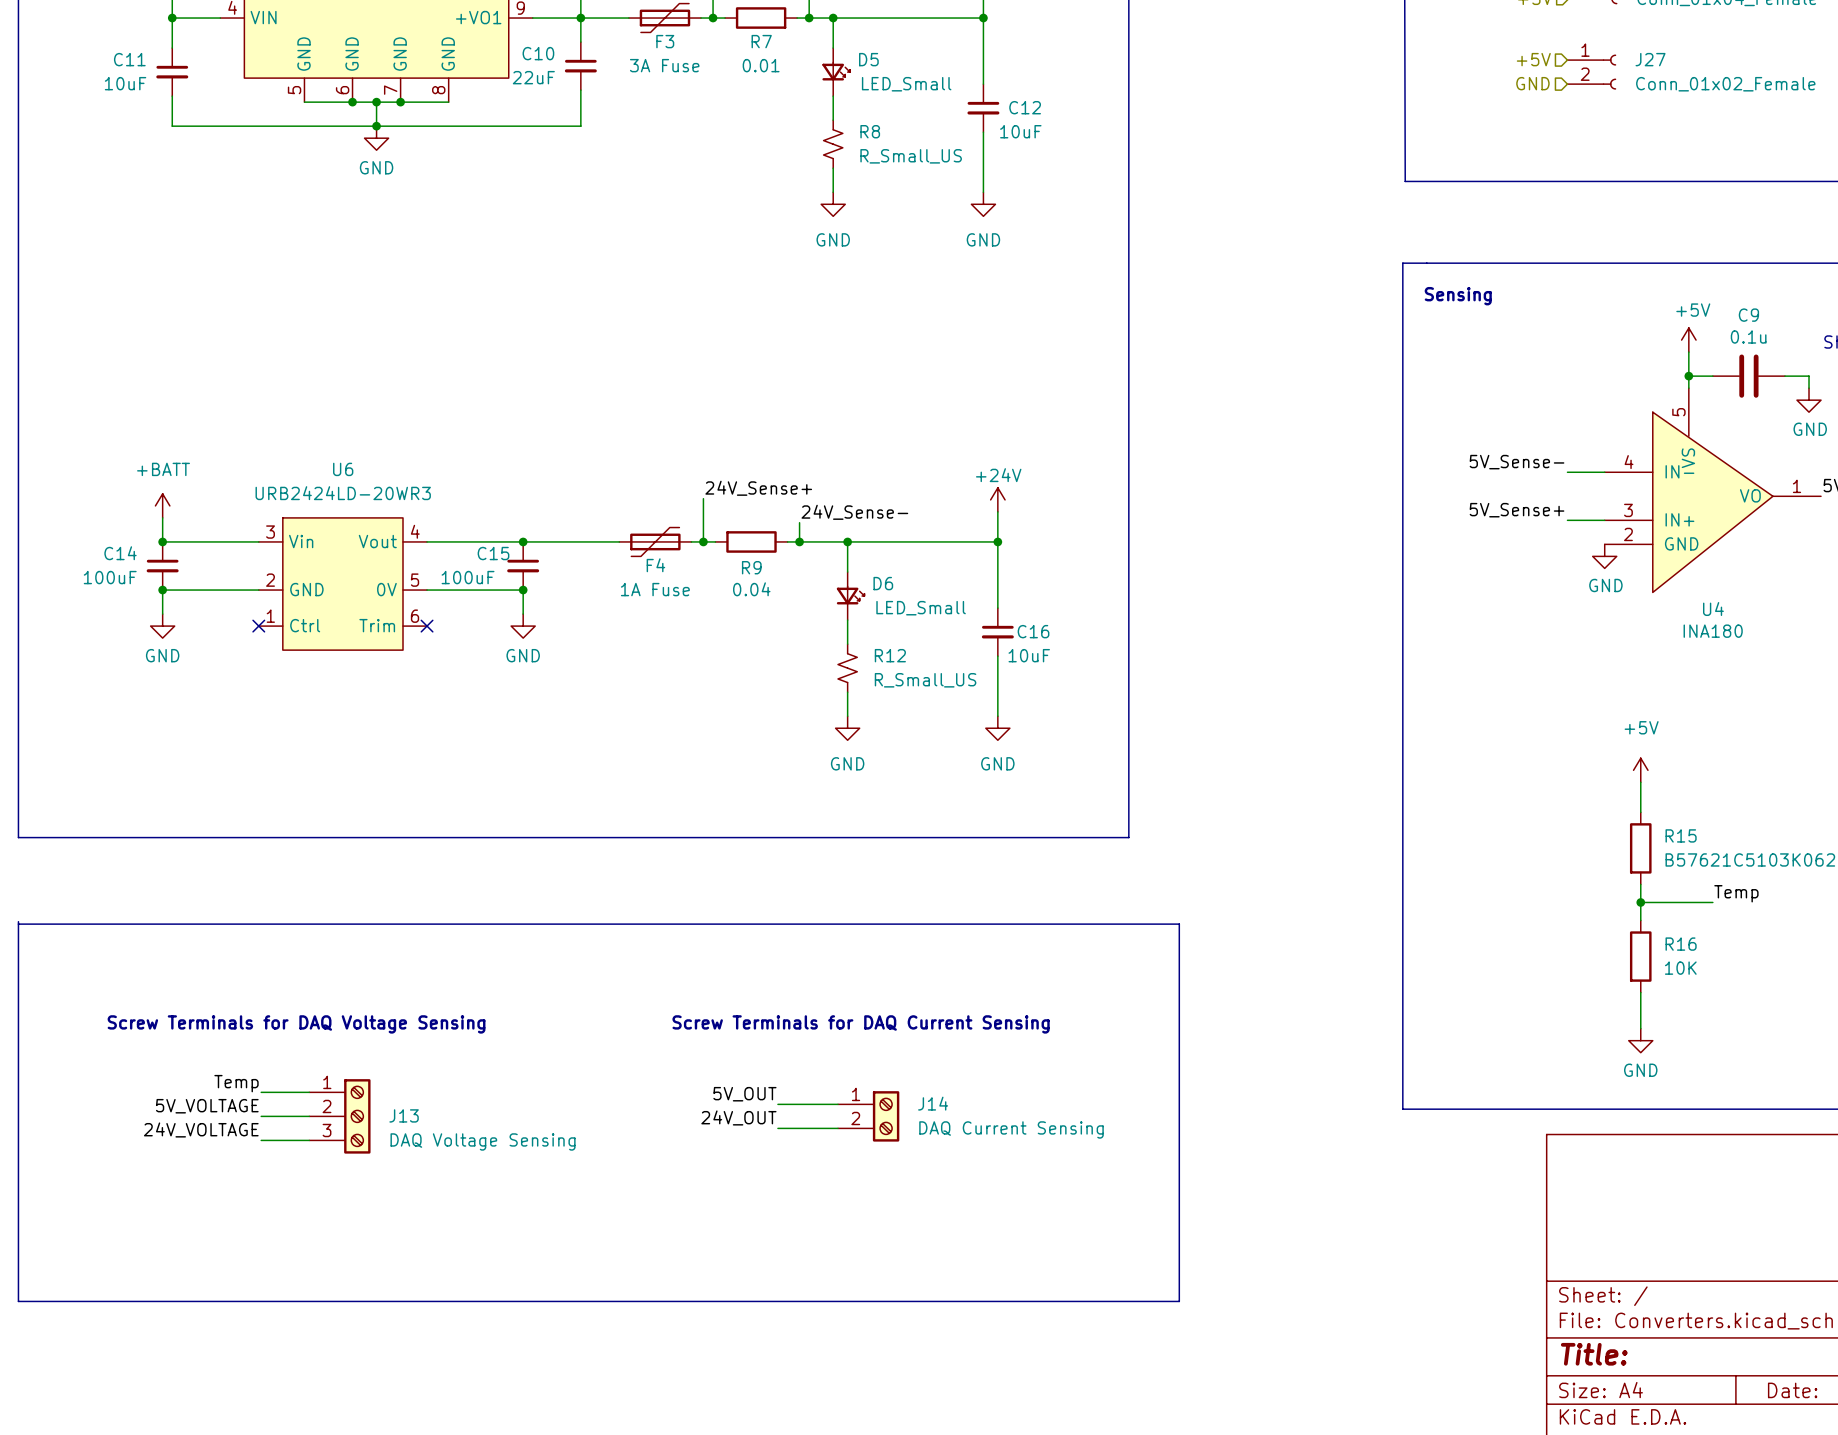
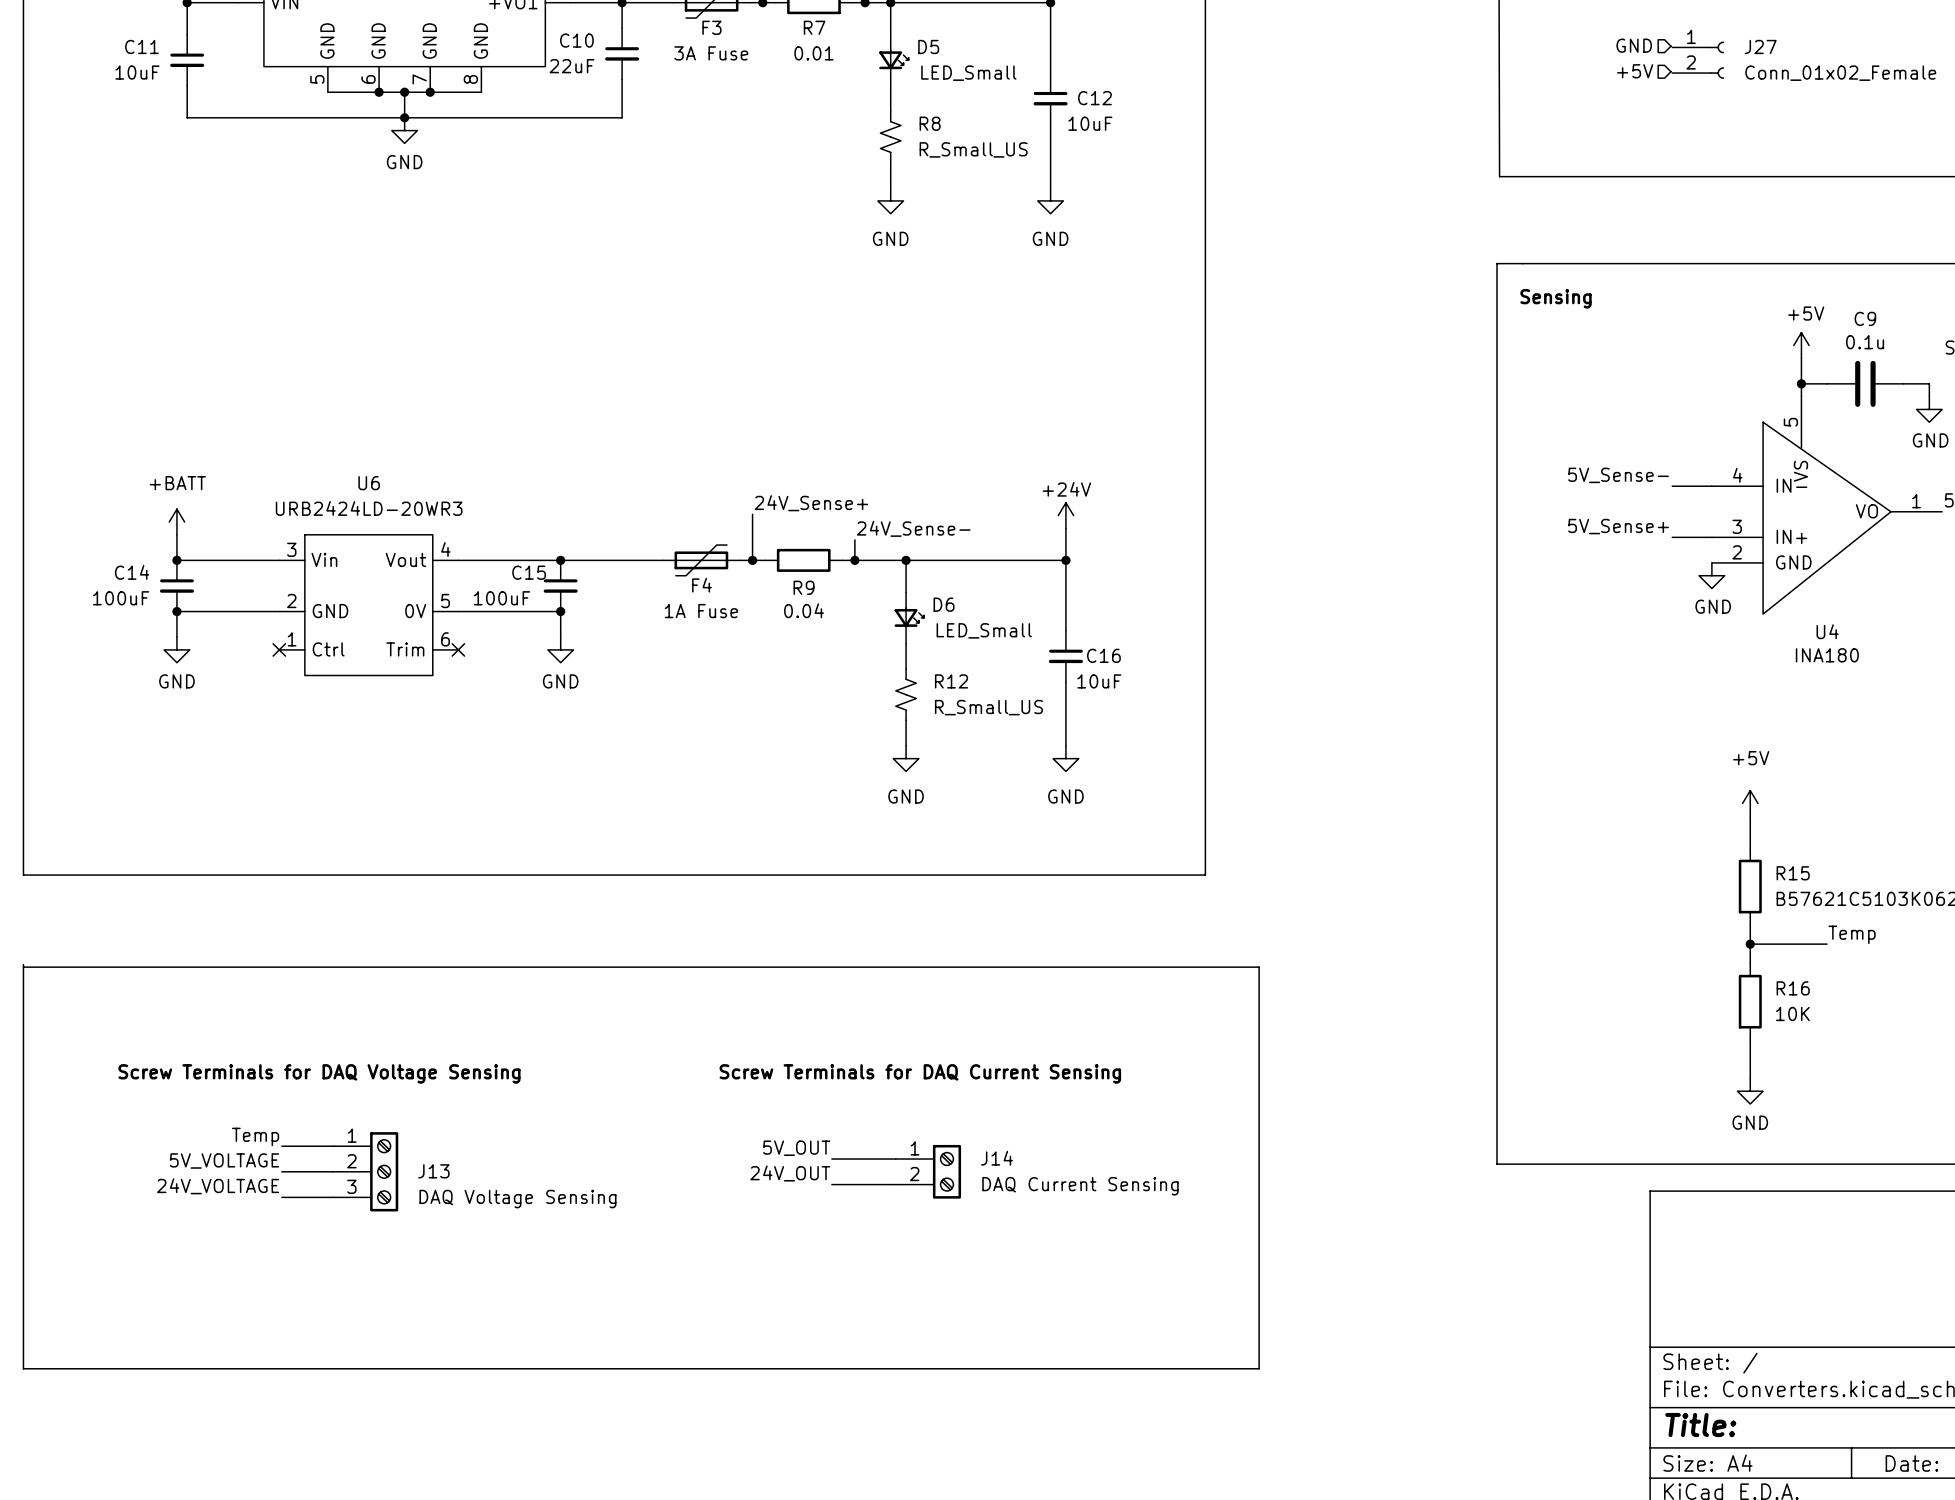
hierarchical label: +5V (1533, 59) -> GND (1634, 45)
hierarchical label: GND (1532, 83) -> +5V (1635, 71)

